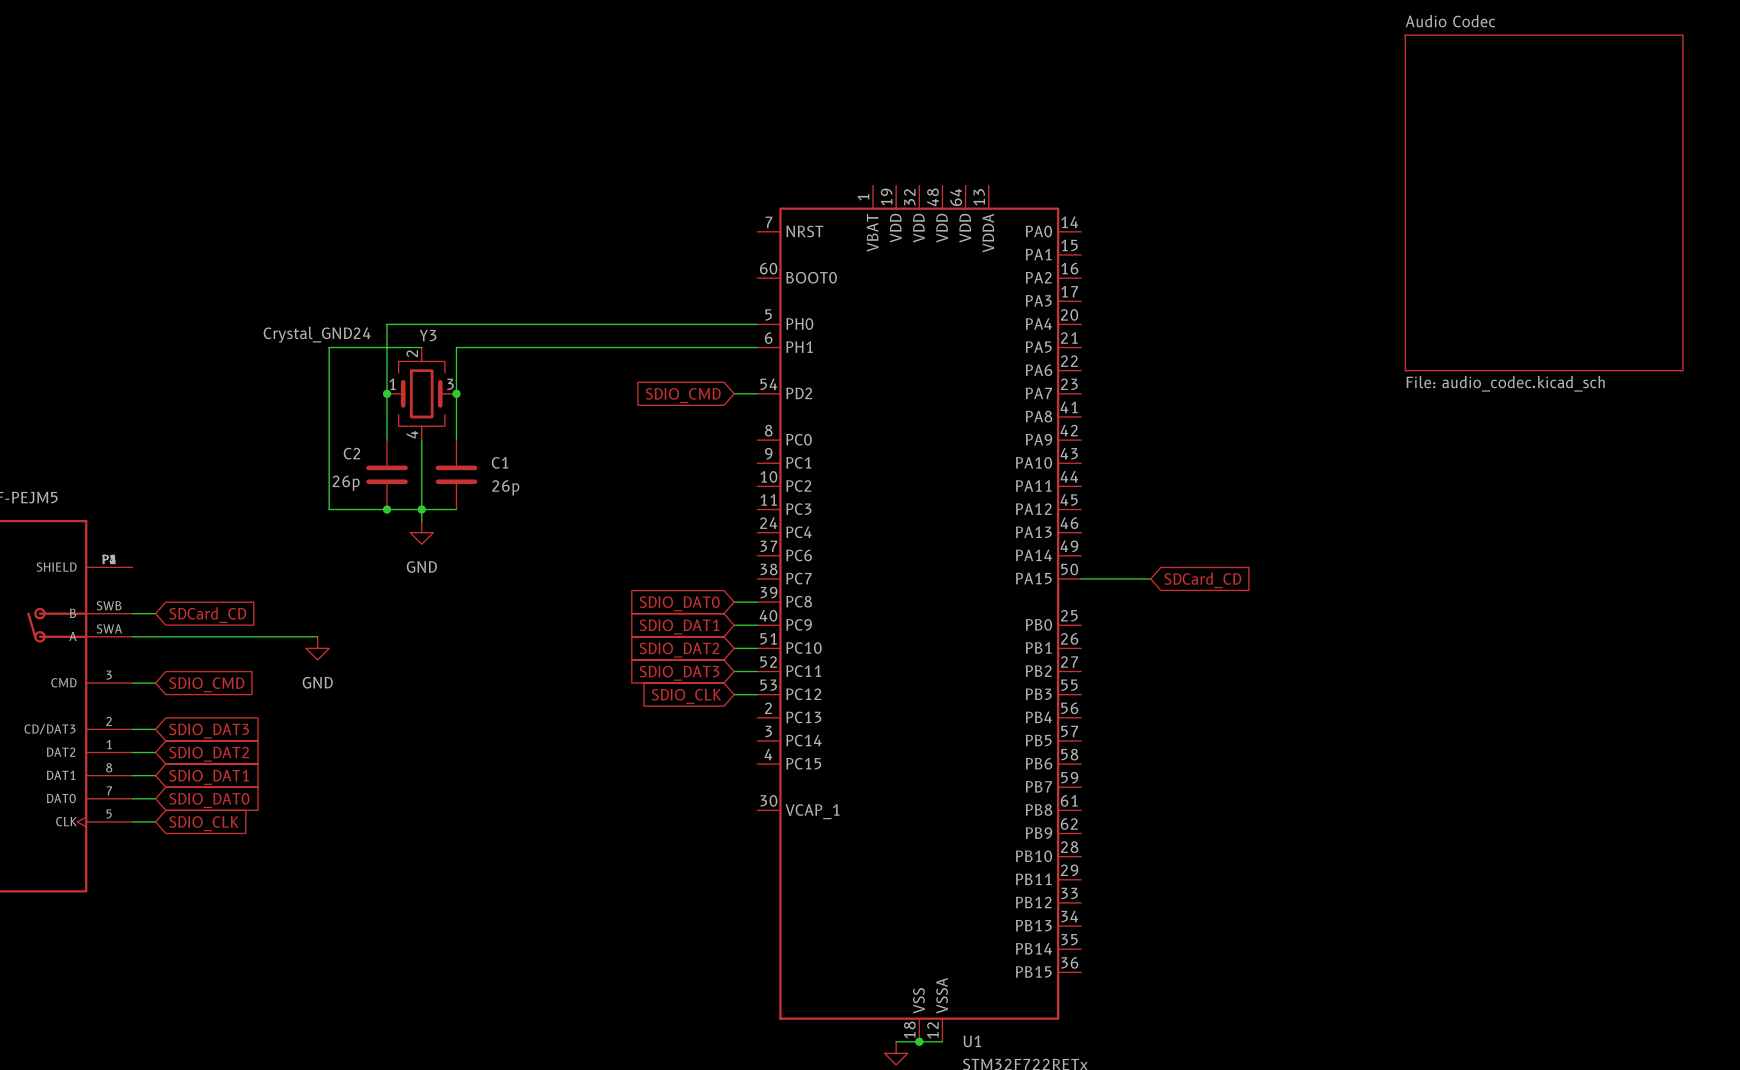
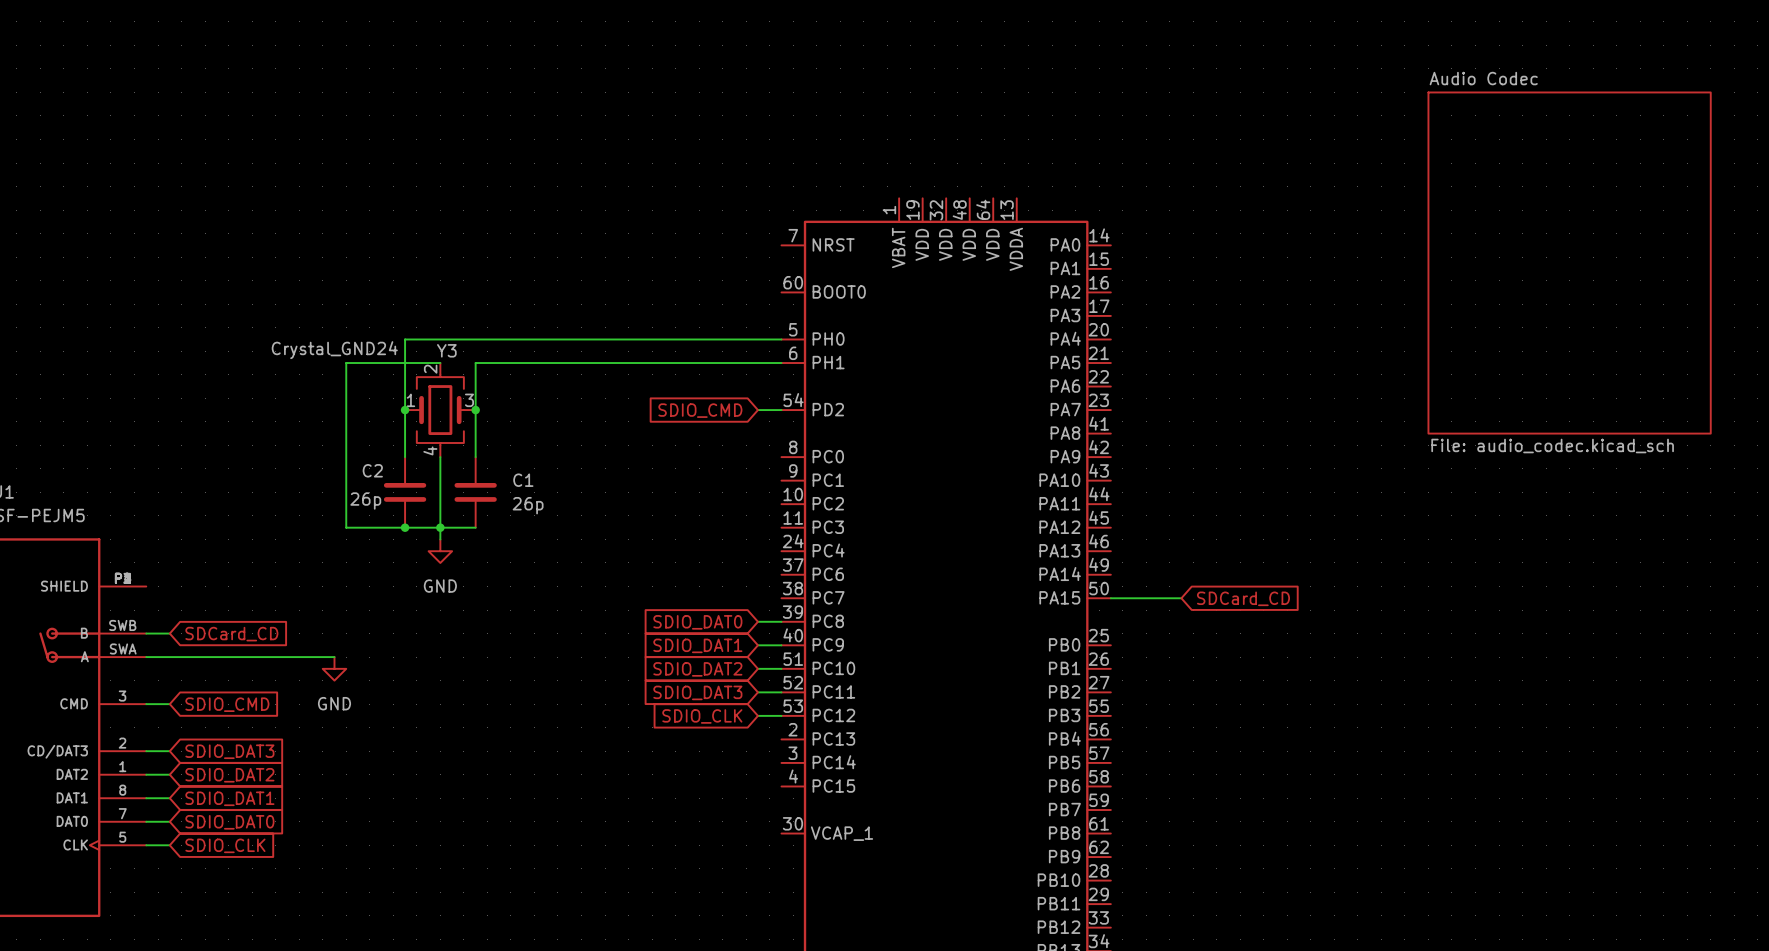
sheet Audio Codec position: (1544, 202) -> (1569, 263)

